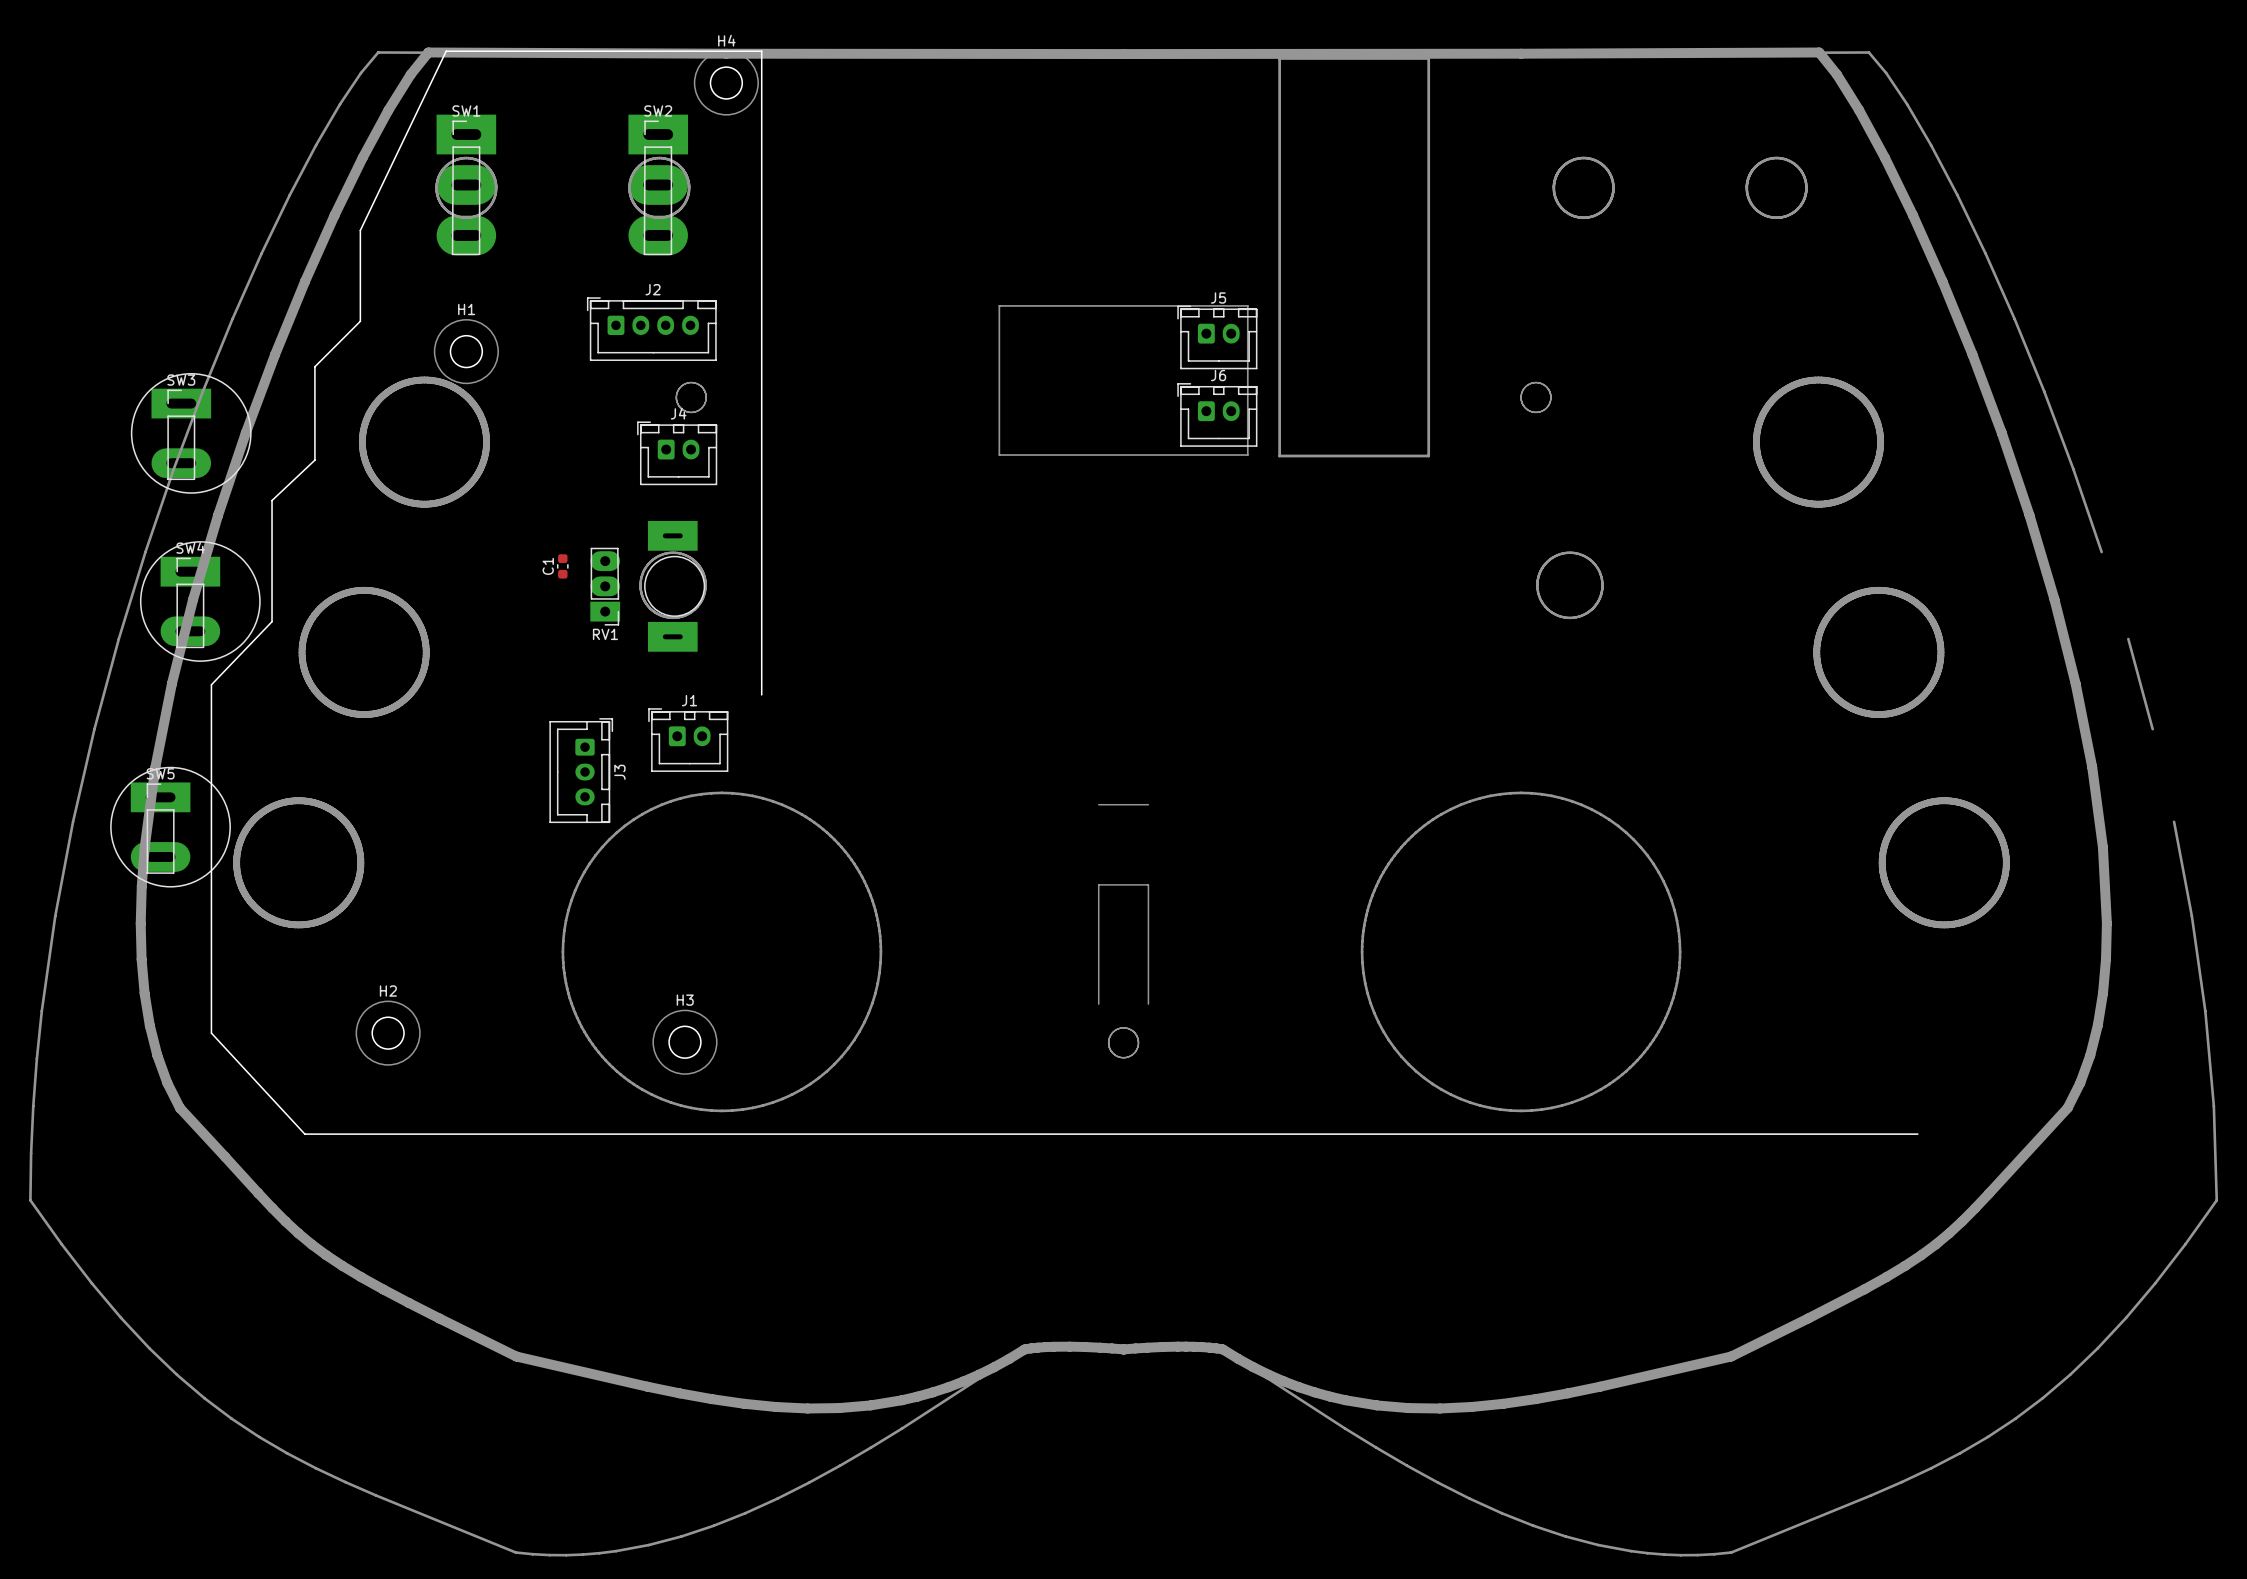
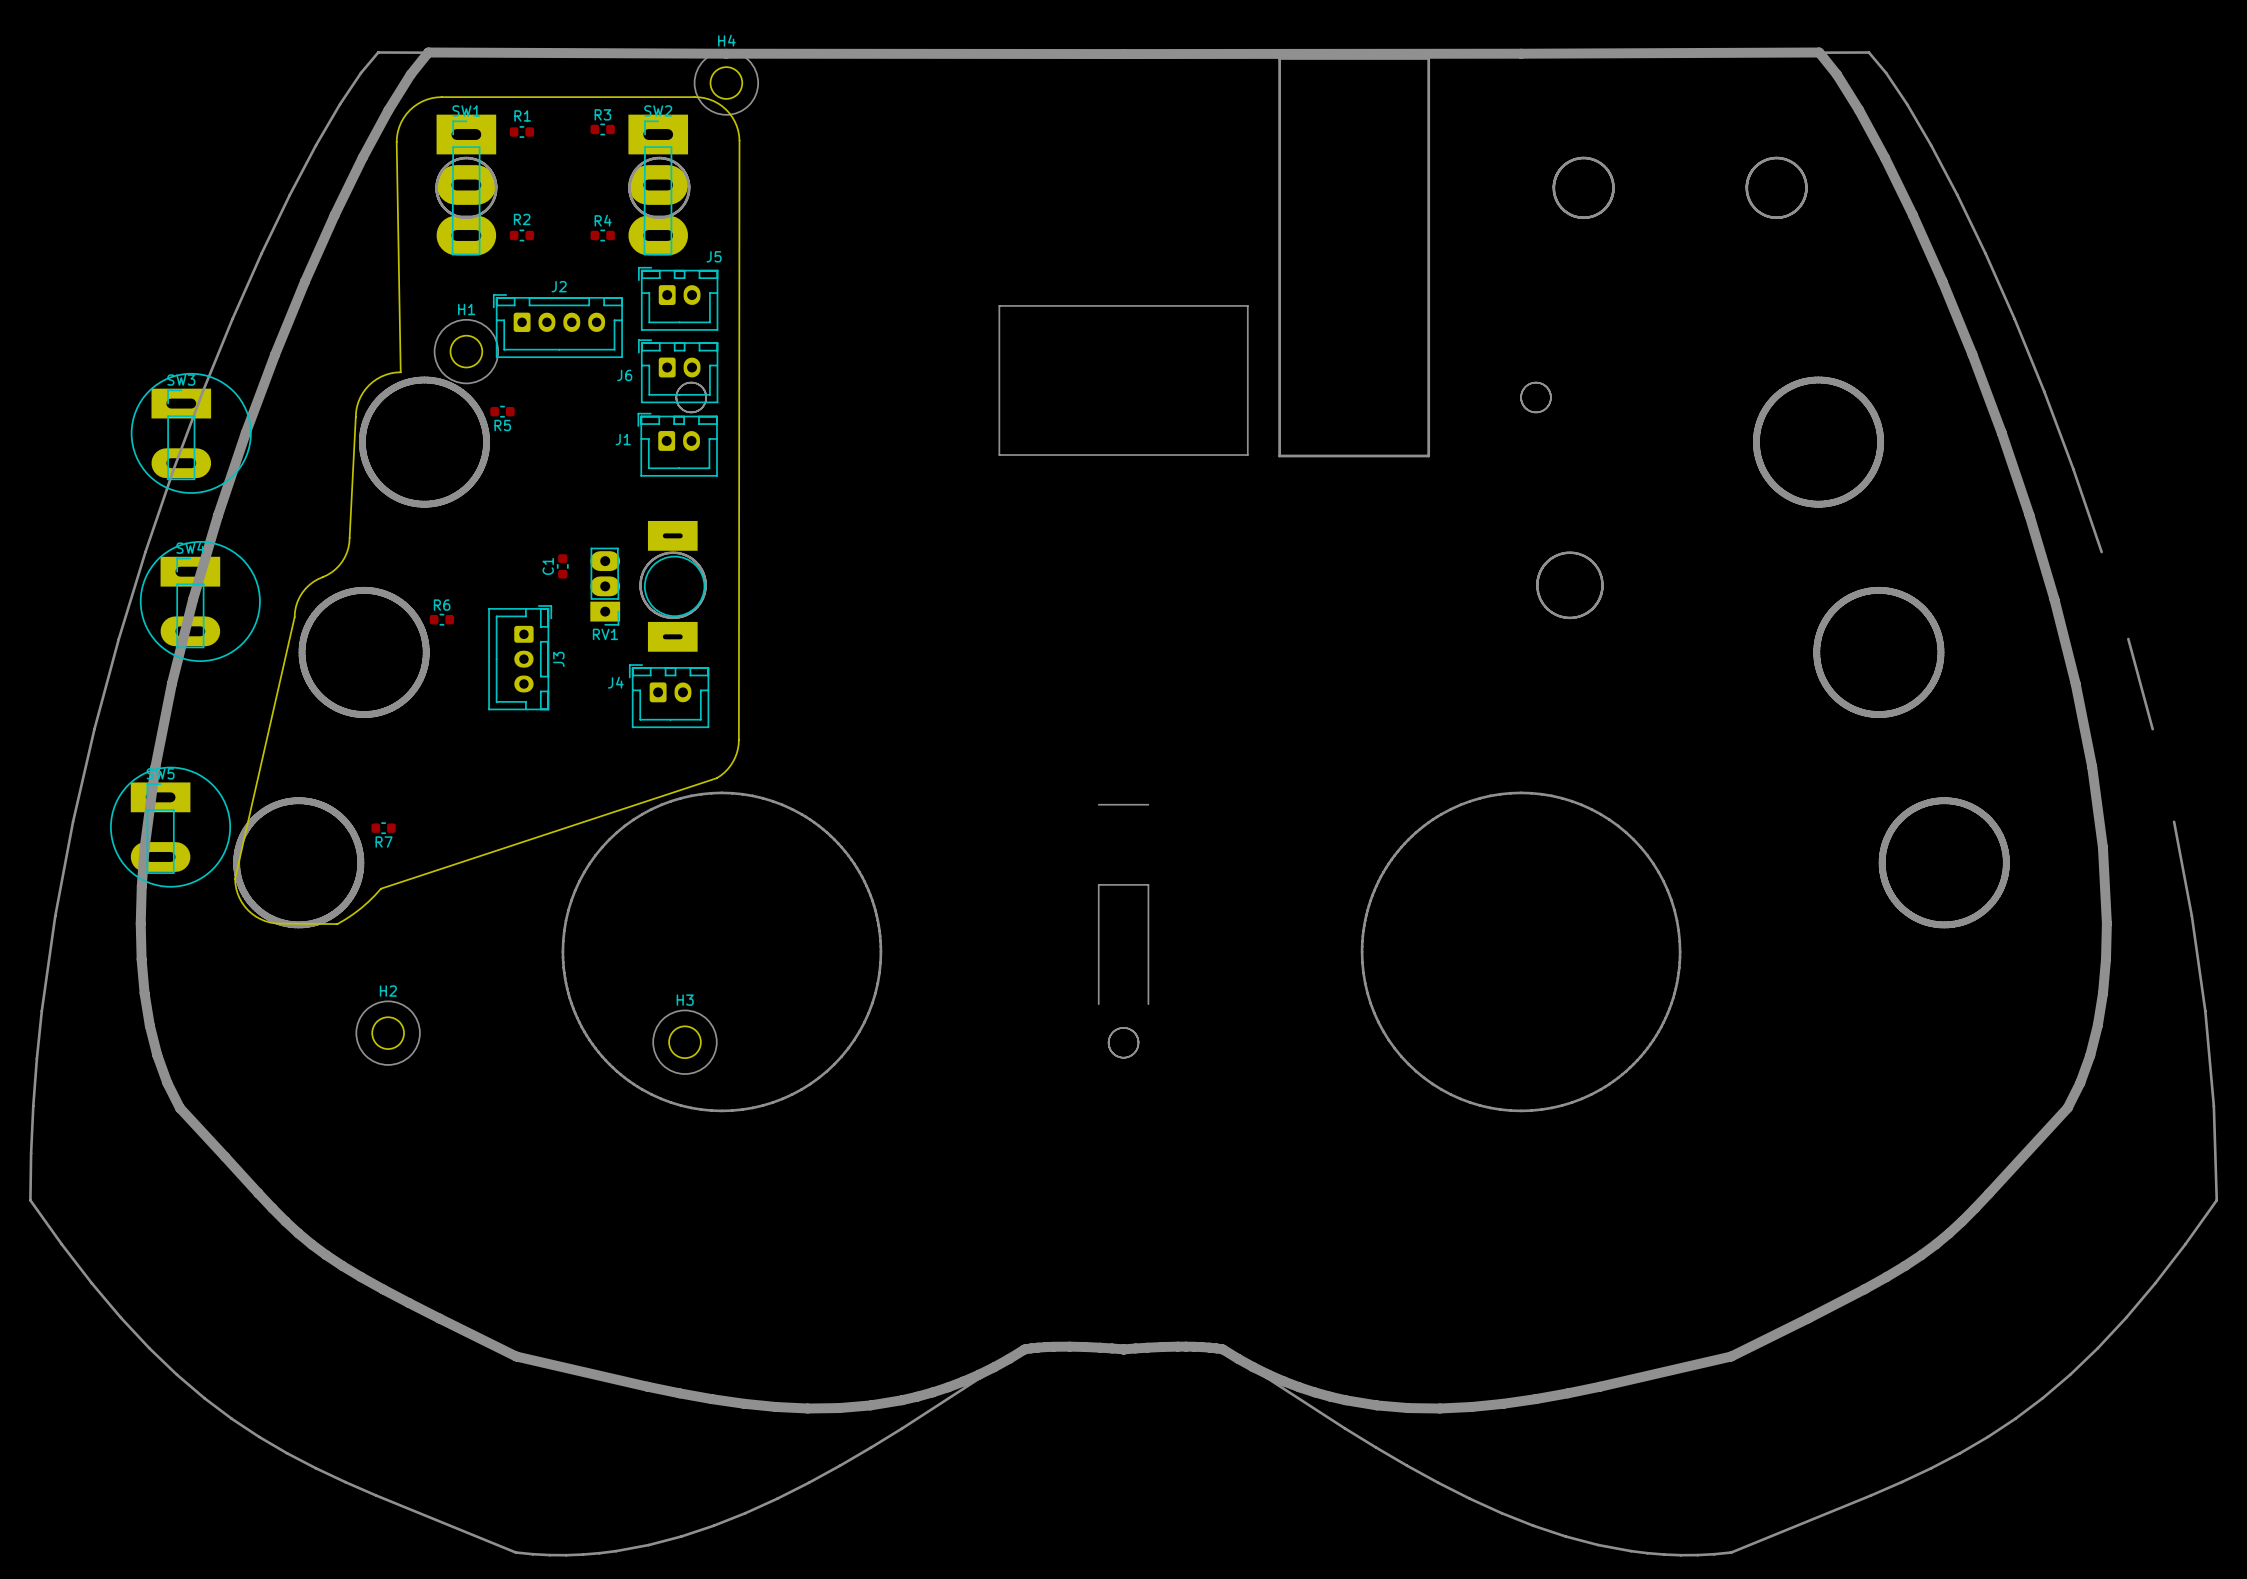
board edge: none -> (441, 97) (699, 97) (709, 99) (722, 106) (734, 121) (739, 140) (737, 749) (730, 765) (716, 778) (380, 888) (360, 908) (337, 924) (270, 922) (256, 916) (244, 906) (237, 893) (235, 878) (297, 601) (309, 585) (331, 572) (339, 565) (348, 547) (356, 412) (358, 402) (365, 389) (372, 382) (385, 374) (400, 372) (397, 132) (403, 118) (413, 106) (426, 99) (441, 97)
R3: none -> (602, 129)
R1: none -> (521, 131)
R2: none -> (521, 235)
R4: none -> (602, 235)
J5 name position: J5 (1218, 298) -> J5 (714, 256)
J2 position: (651, 329) -> (557, 326)
J5 position: (1217, 337) -> (678, 298)
J6 name position: J6 (1218, 375) -> J6 (624, 375)
R5: none -> (502, 411)
J4 name position: J4 (678, 413) -> J4 (615, 682)
J6 position: (1217, 414) -> (678, 371)
J4 position: (677, 453) -> (669, 696)
R6: none -> (441, 619)
board edge: (761, 694) (761, 51) (446, 51) (360, 230) (360, 321) (314, 366) (314, 460) (272, 500) (272, 621) (211, 684) (211, 1033) (304, 1134) (1917, 1134) -> none
J1 name position: J1 (689, 700) -> J1 (623, 439)
J1 position: (688, 740) -> (677, 444)
J3 position: (581, 770) -> (520, 657)
R7: none -> (383, 828)

